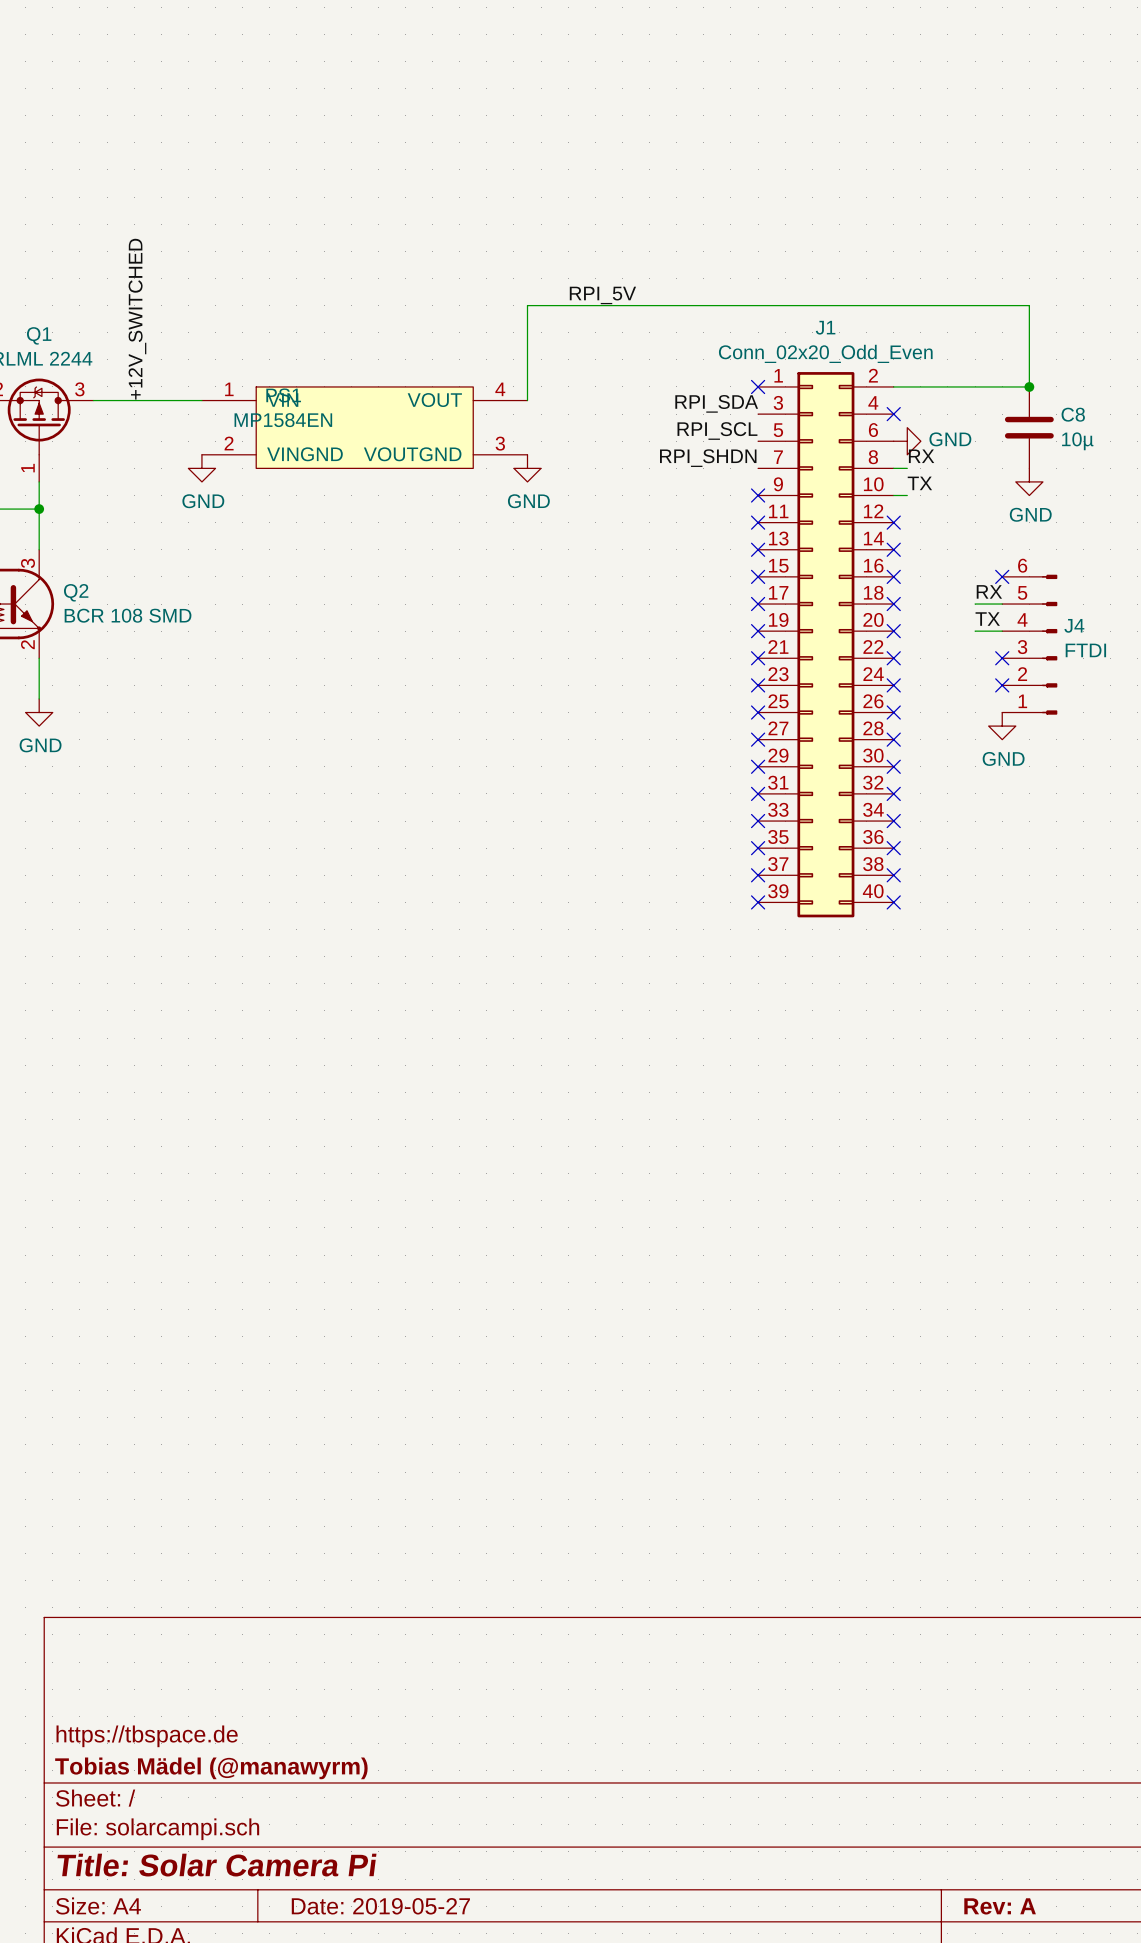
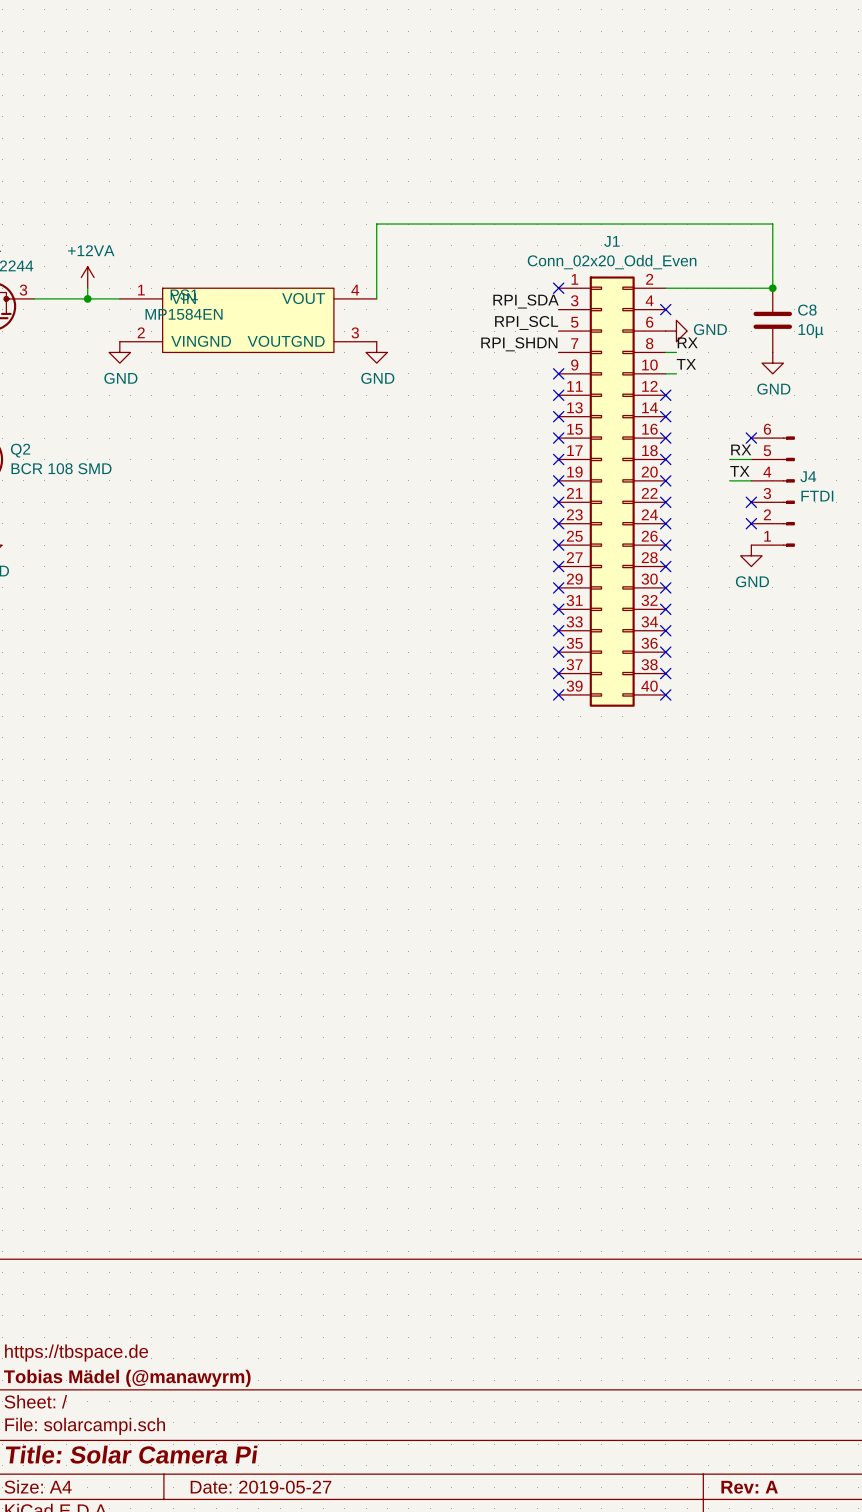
label: RPI_5V (602, 295) -> none
label: +12V_SWITCHED (137, 319) -> none
power symbol: none -> +12VA (87, 277)
wire: none -> (87, 288) (87, 298)
junction: none -> (87, 298)

